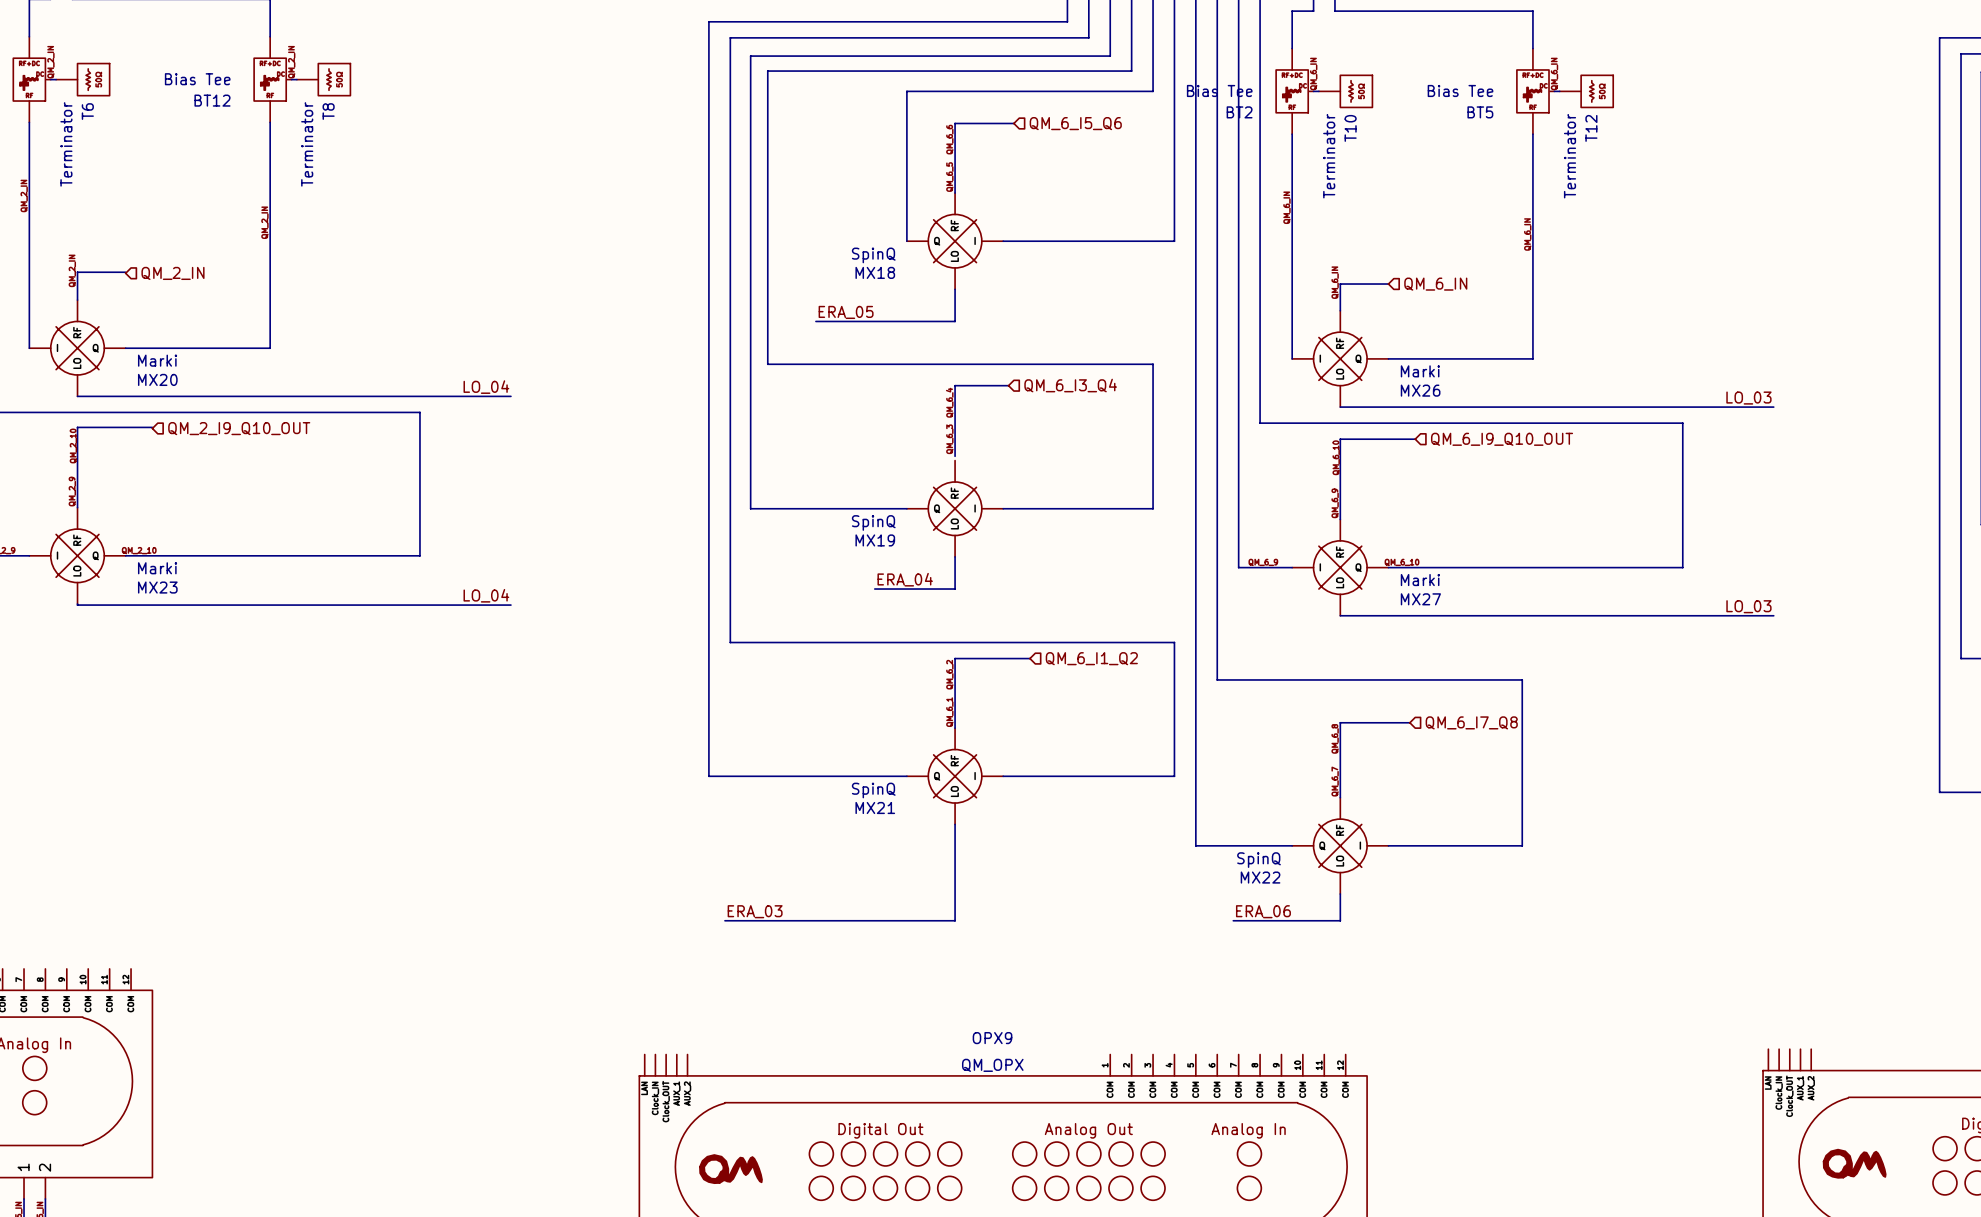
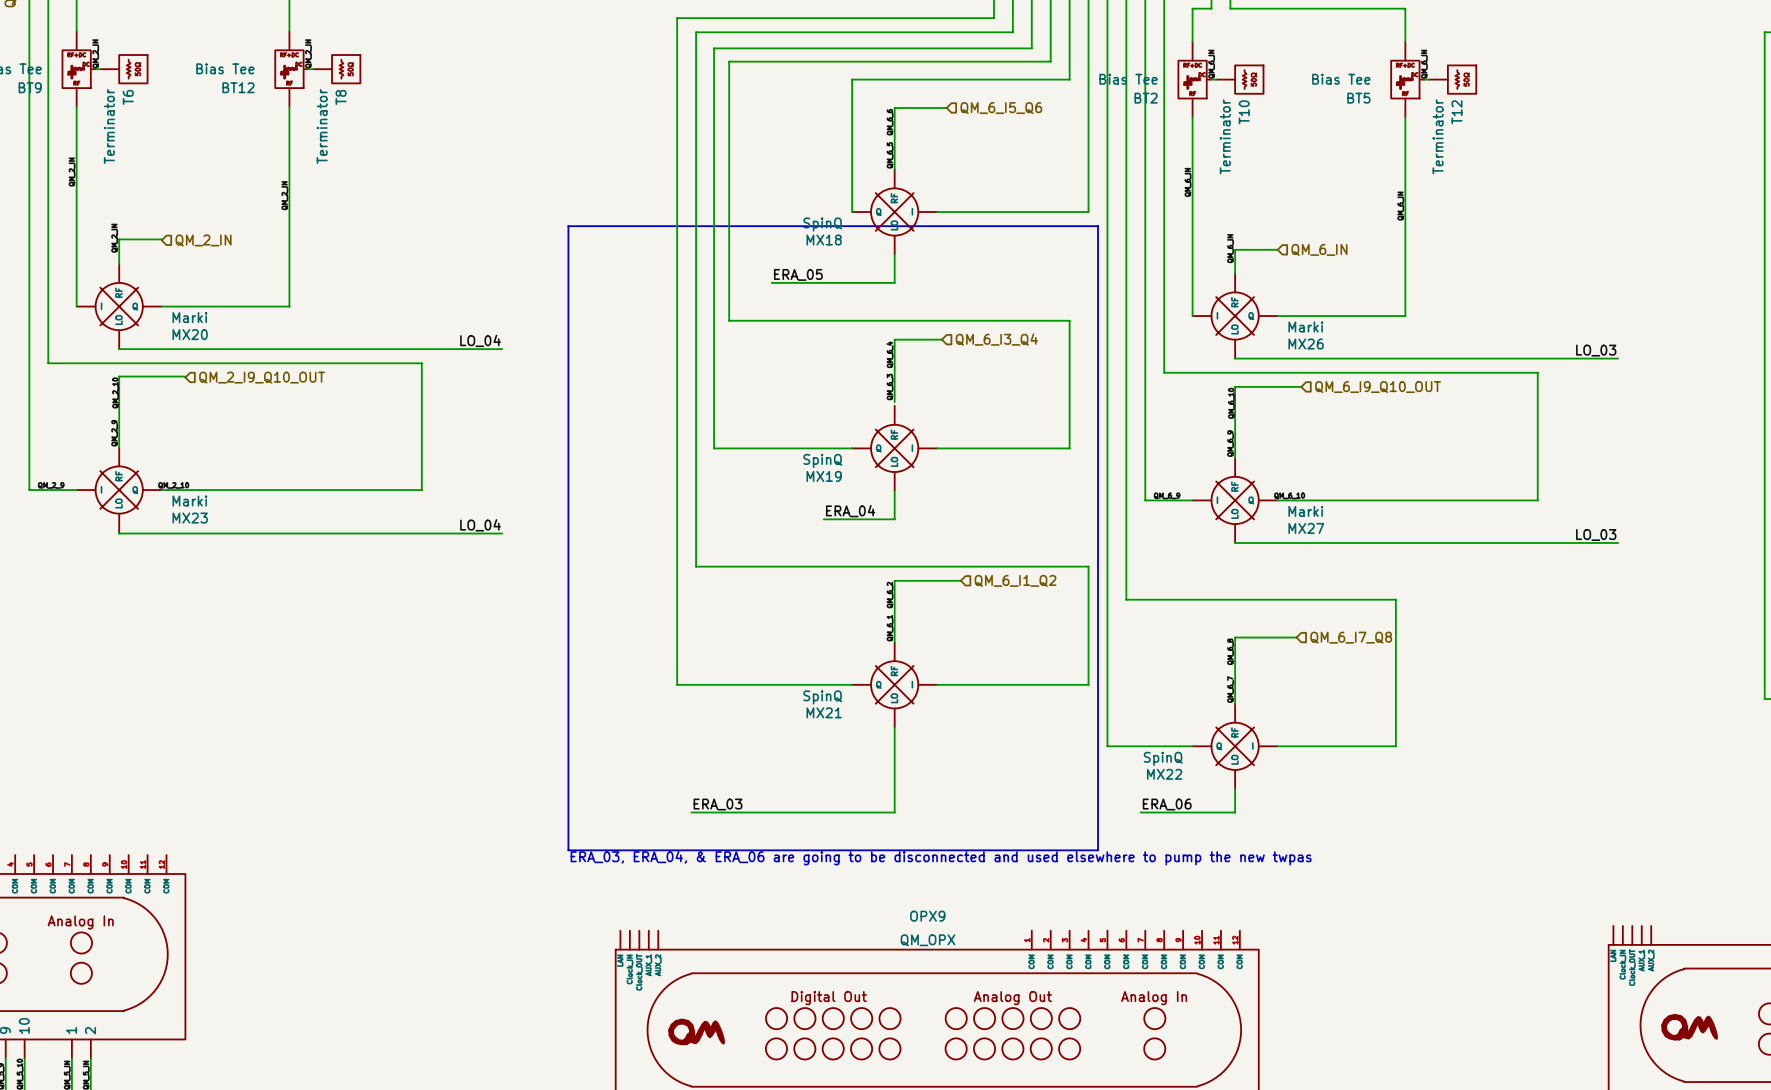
line: none -> (568, 226) (1097, 226) (1097, 850) (568, 850) (568, 226)
text: none -> ERA_03, ERA_04, & ERA_06 are going to be disconnected and used elsewhere to pump the new twpas (941, 858)

